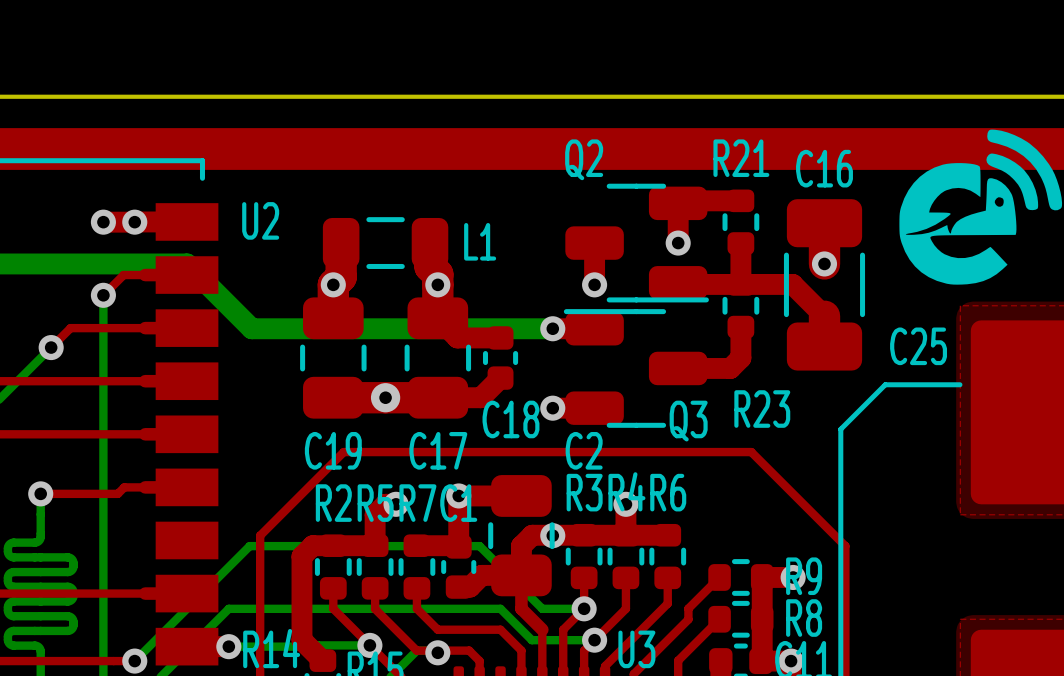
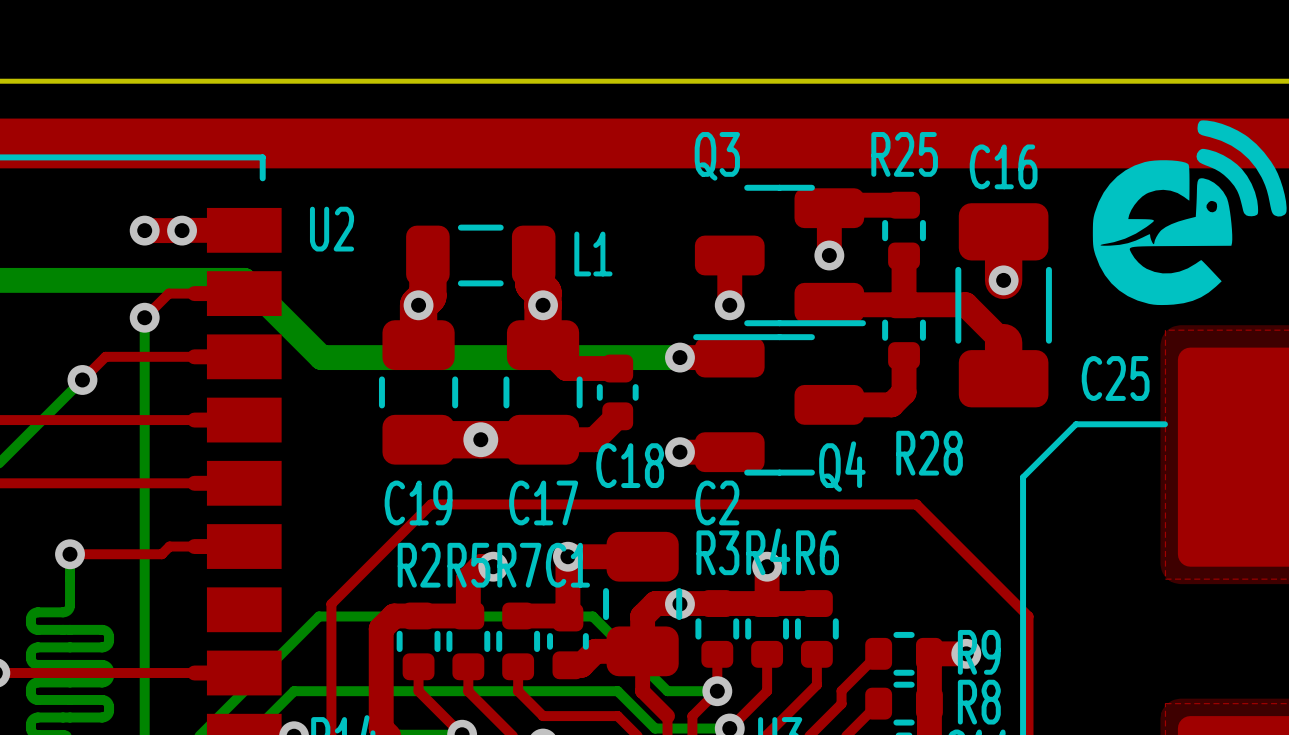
R21 name: R21 (741, 158) -> R25 (904, 154)
Q2 name: Q2 (584, 159) -> Q3 (717, 156)
R23 name: R23 (762, 409) -> R28 (929, 453)
Q3 name: Q3 (688, 421) -> Q4 (842, 466)

